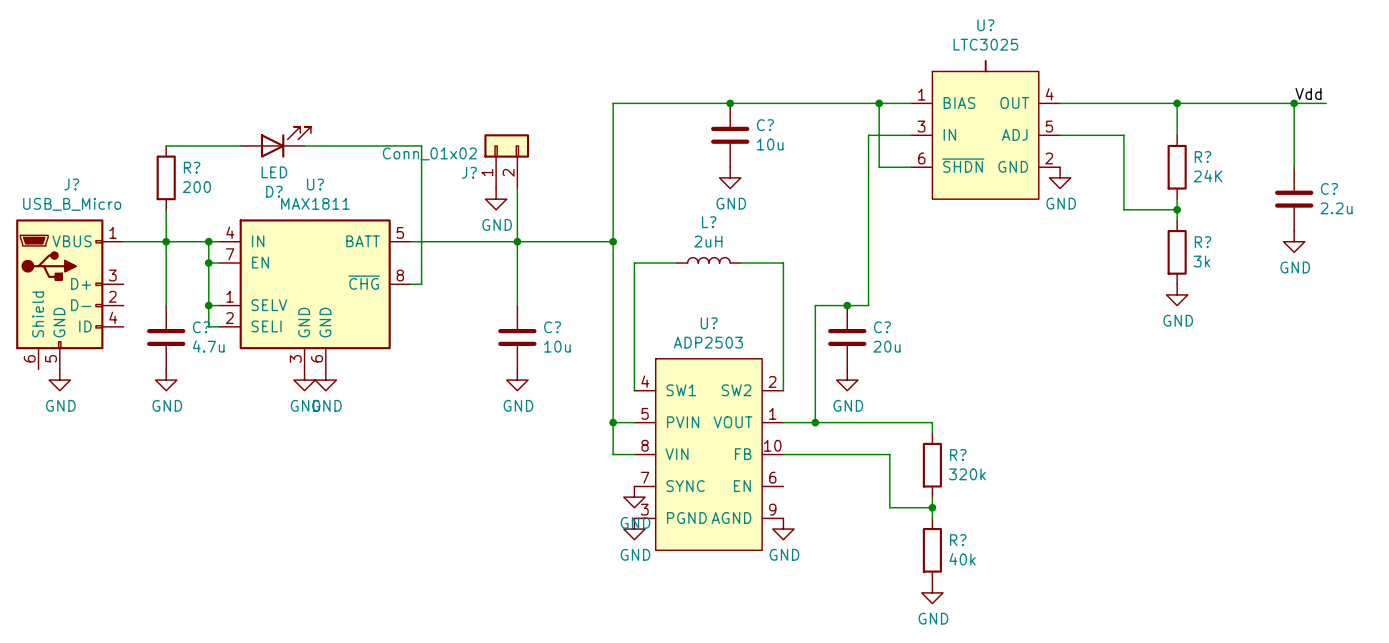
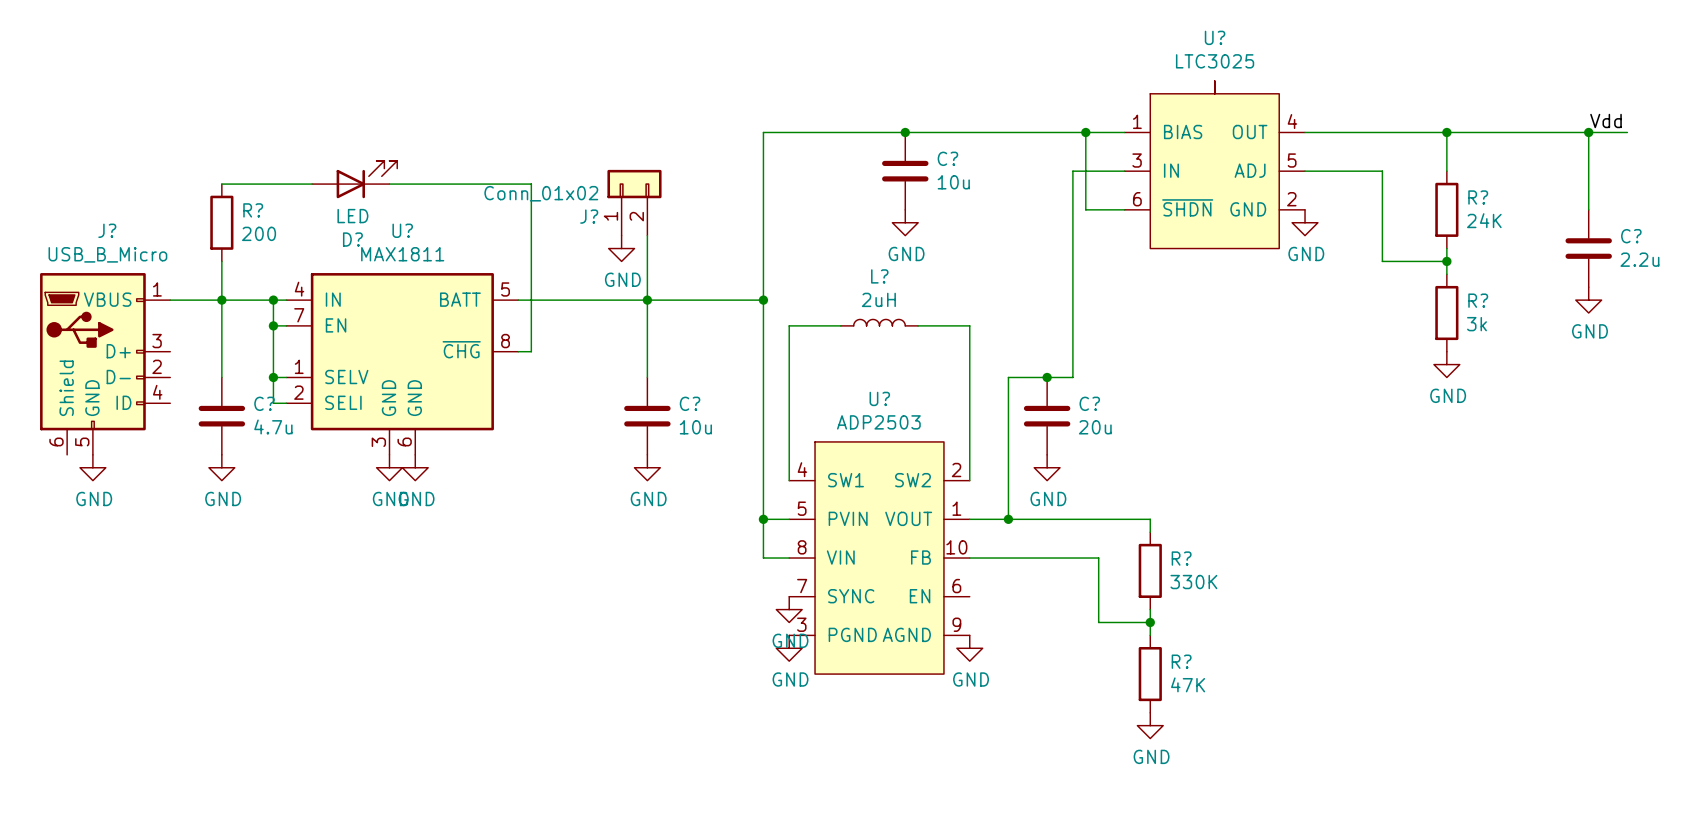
R? value: 320k (967, 474) -> 330K (1193, 582)
R? value: 40k (962, 559) -> 47K (1188, 684)

